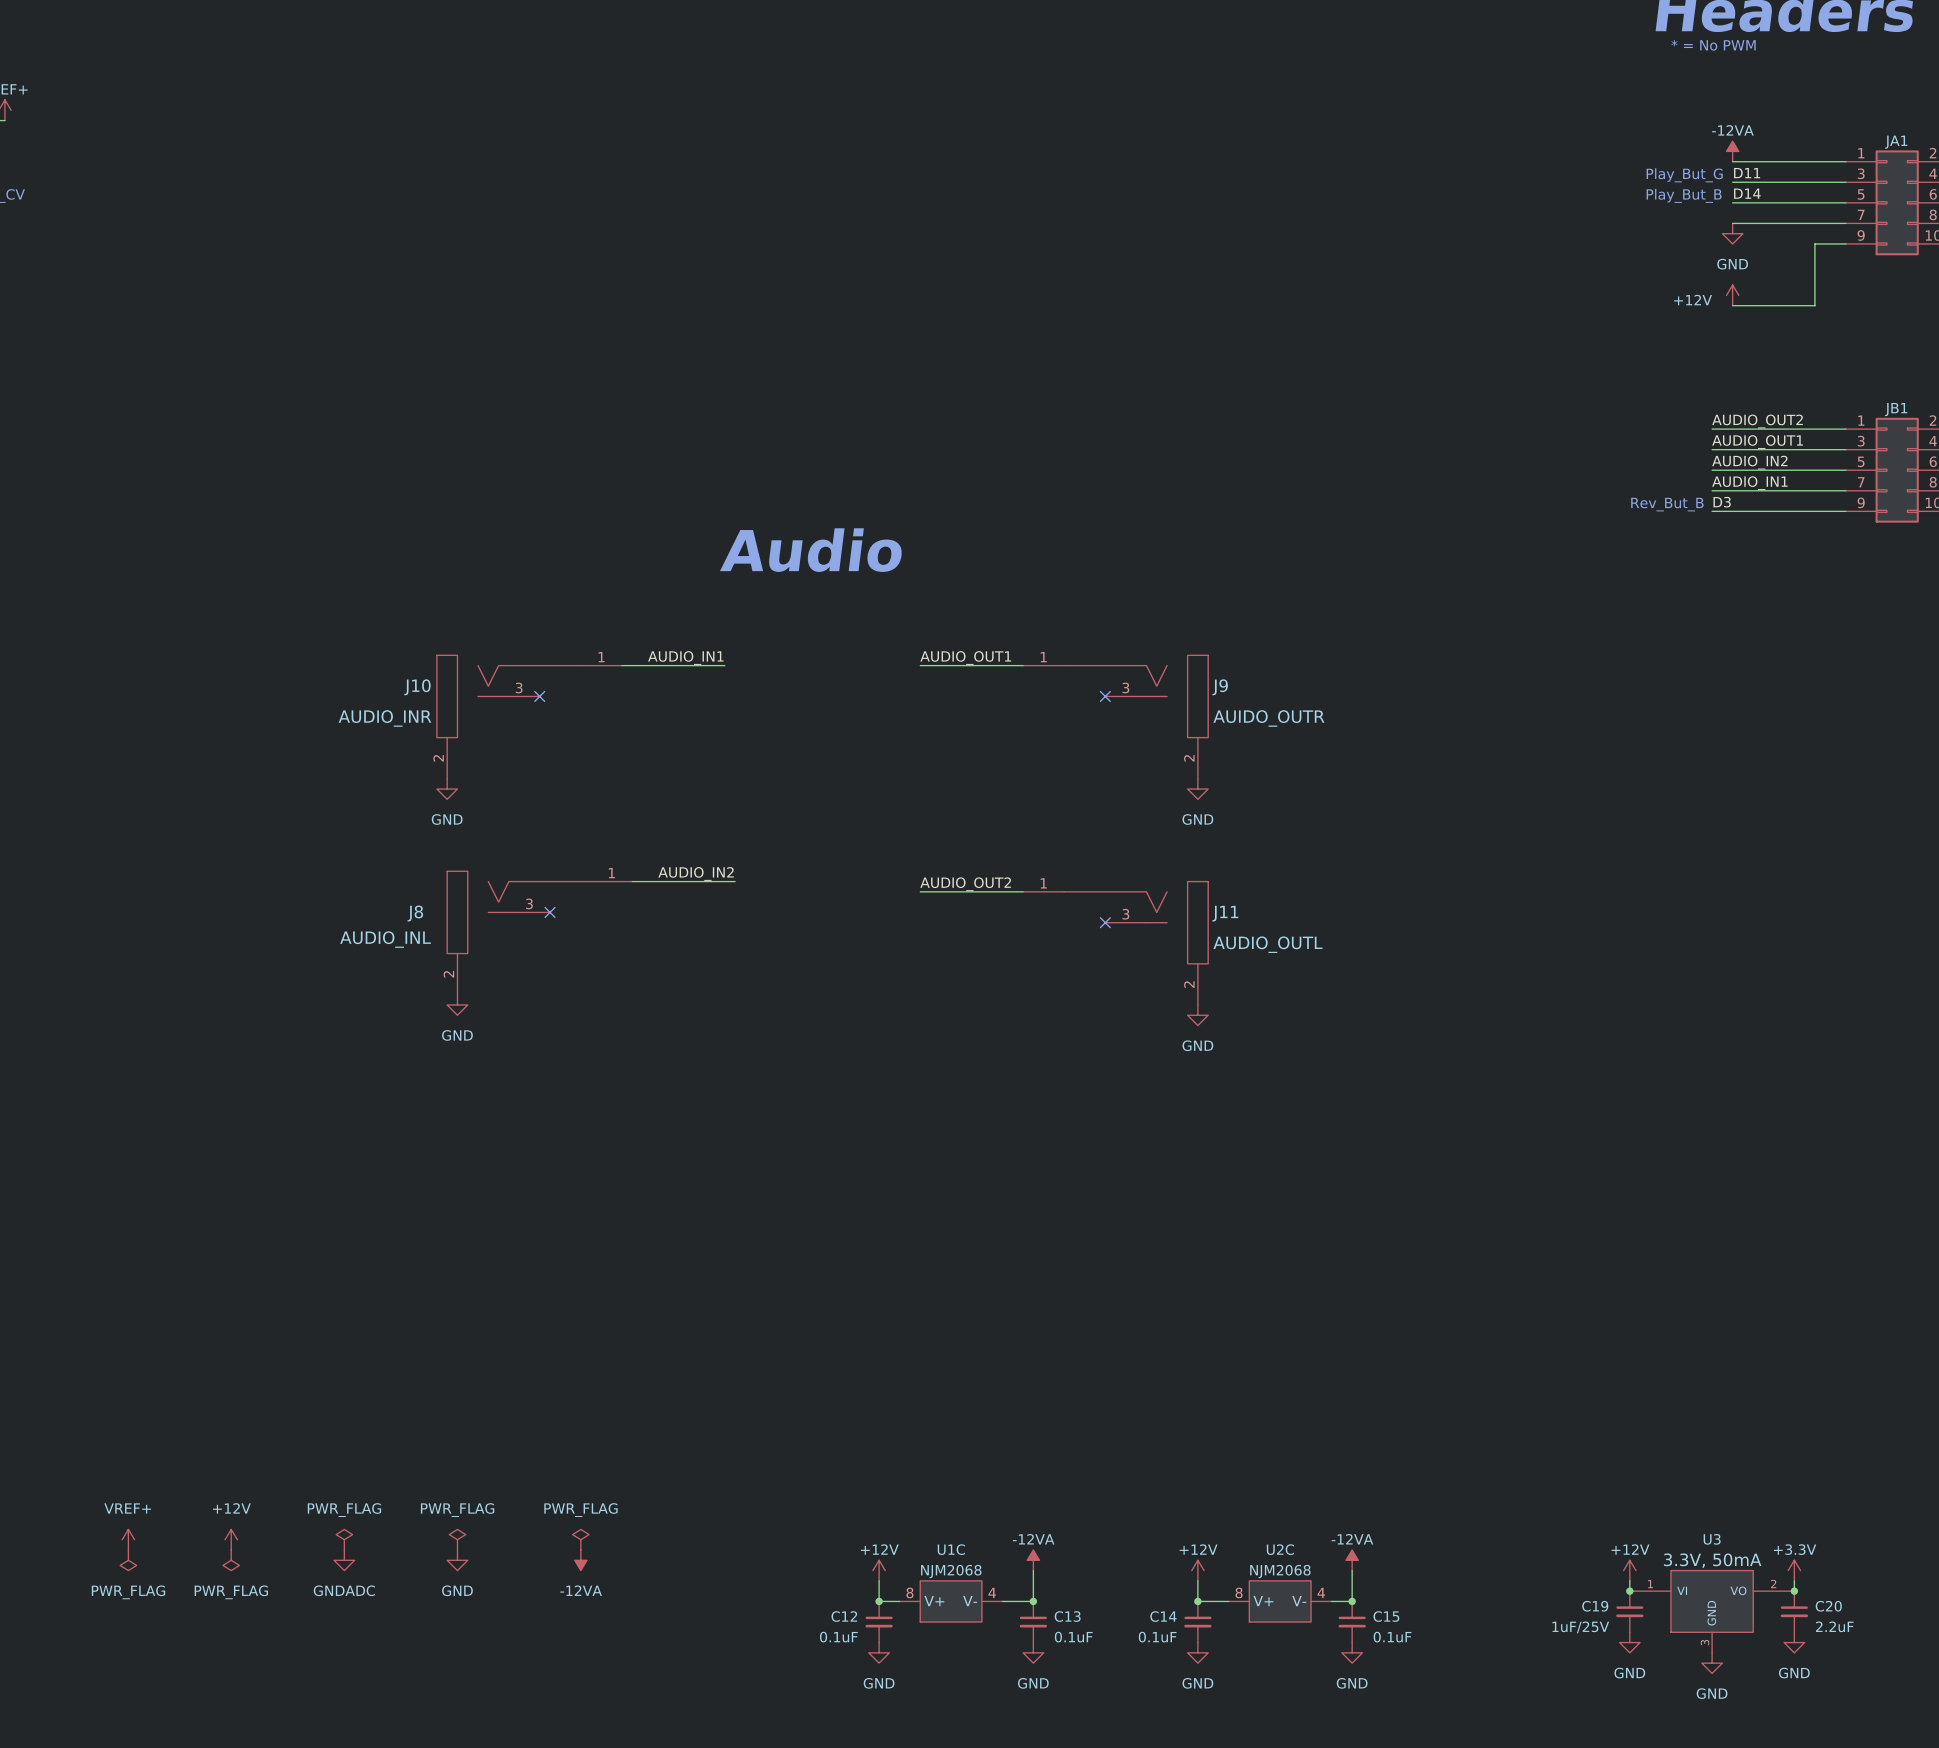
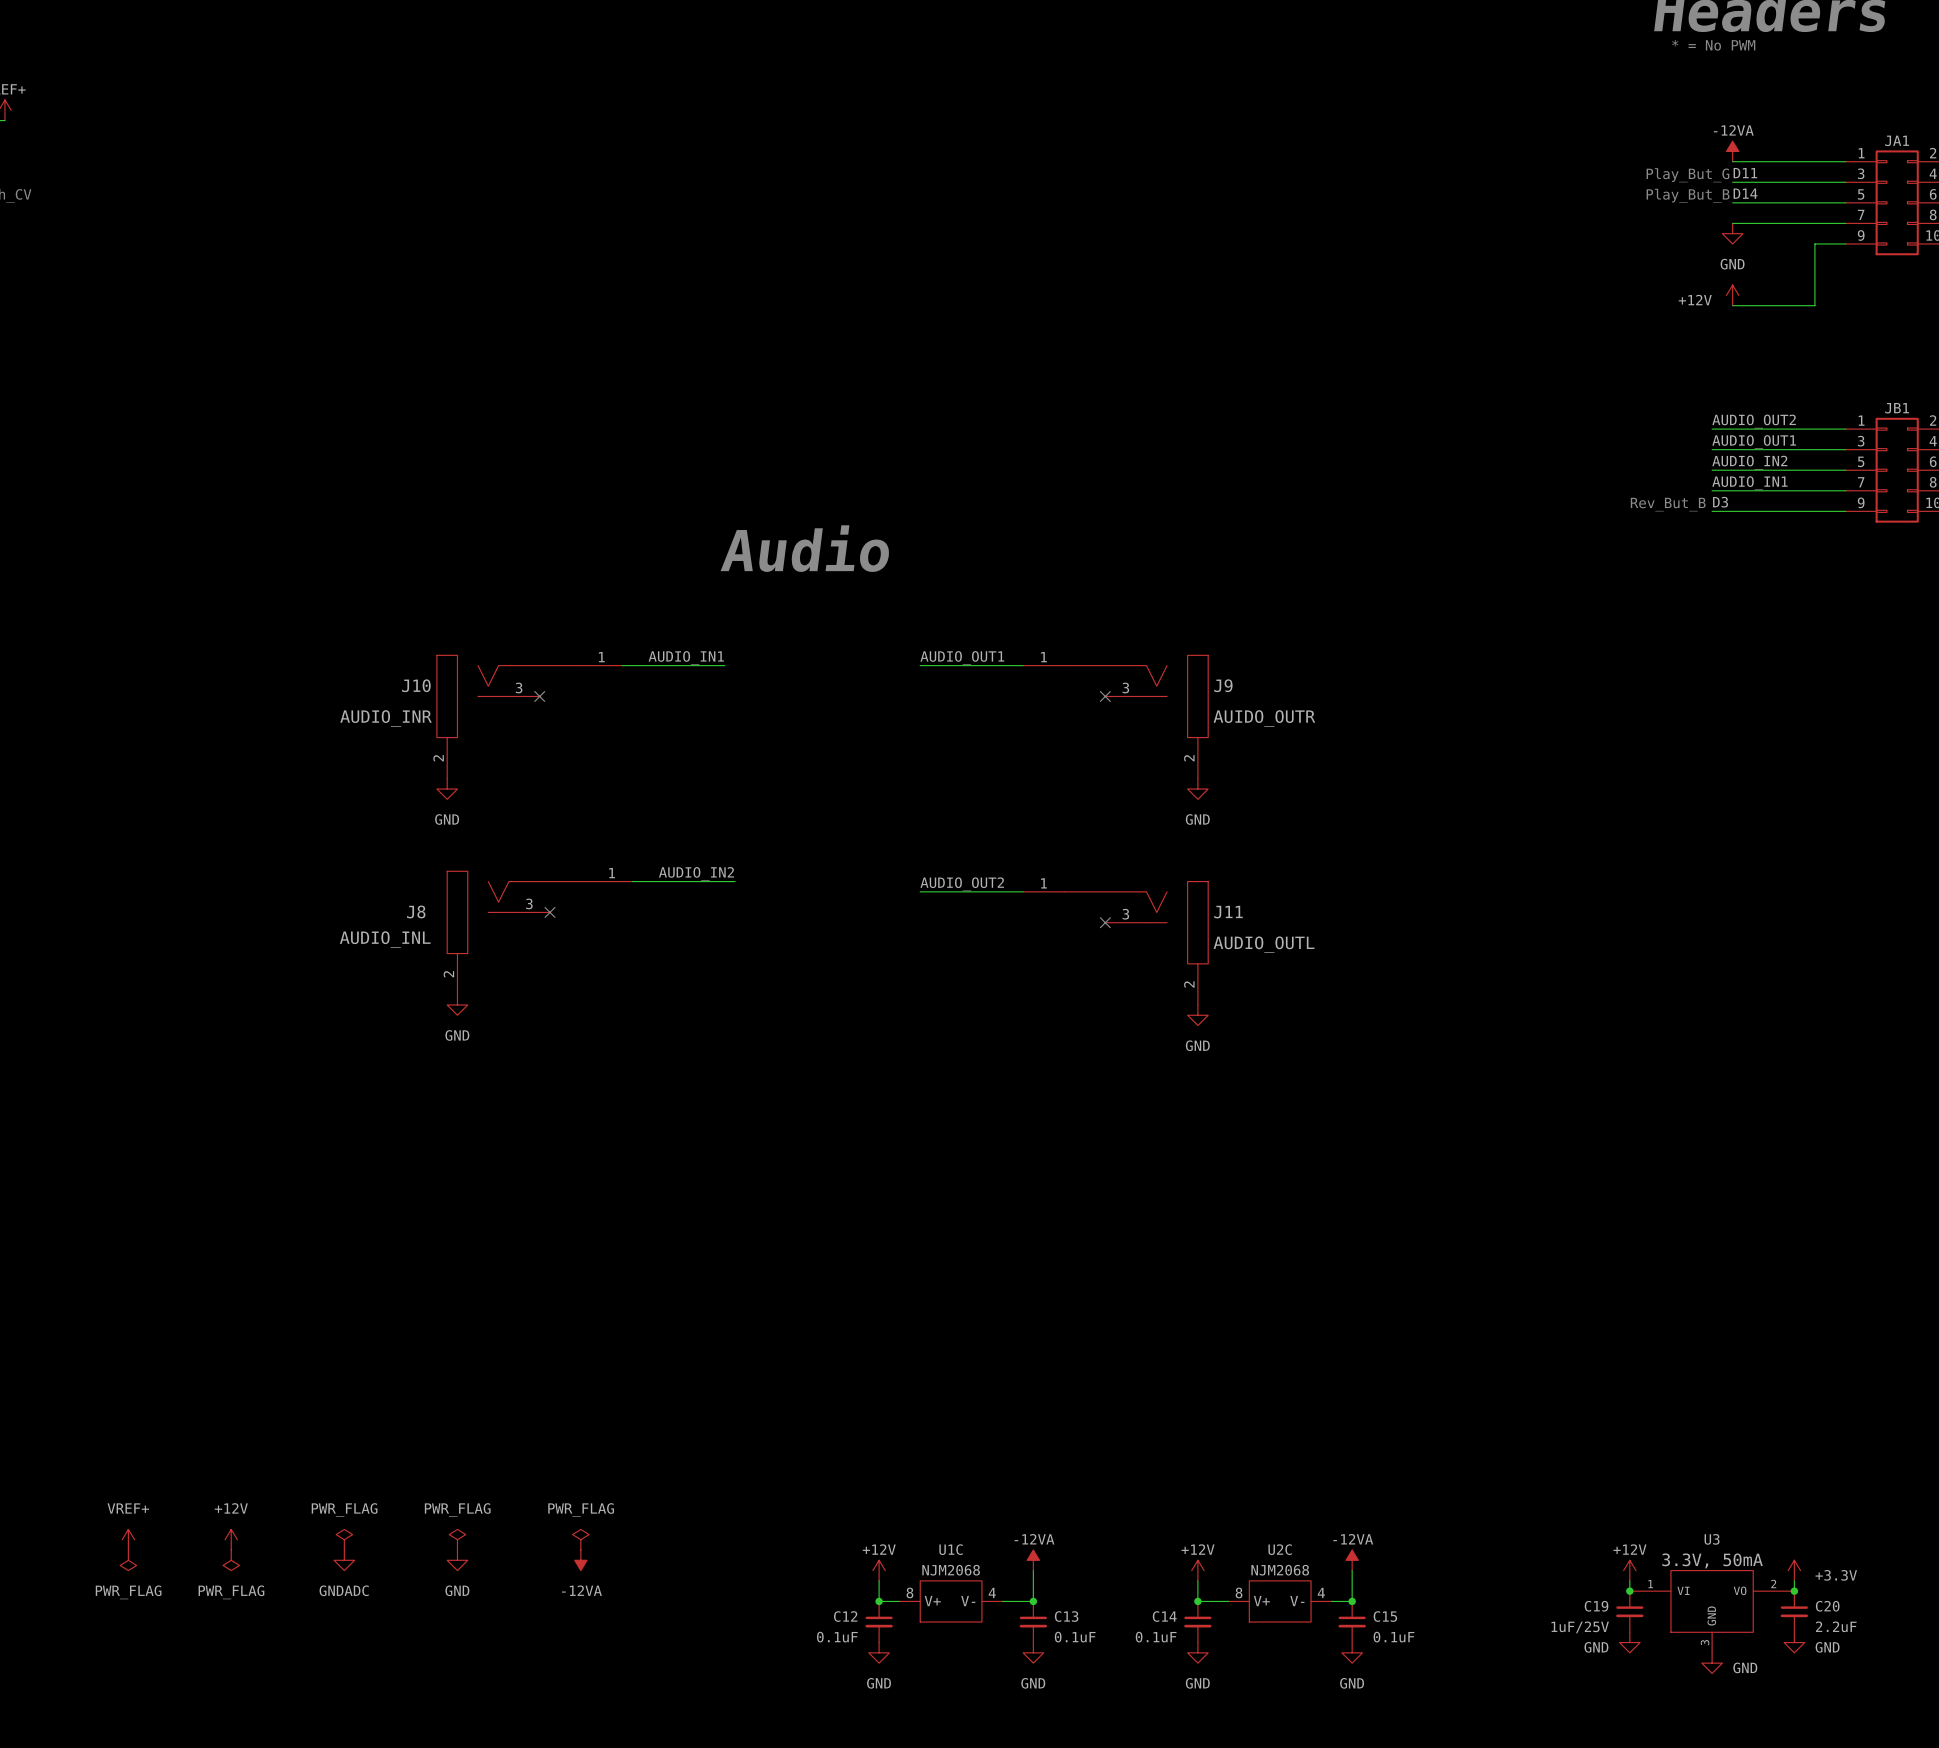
power symbol text position: +3.3V (1795, 1549) -> +3.3V (1836, 1575)
power symbol text position: GND (1629, 1673) -> GND (1596, 1647)
power symbol text position: GND (1794, 1673) -> GND (1827, 1647)
power symbol text position: GND (1712, 1693) -> GND (1745, 1667)

